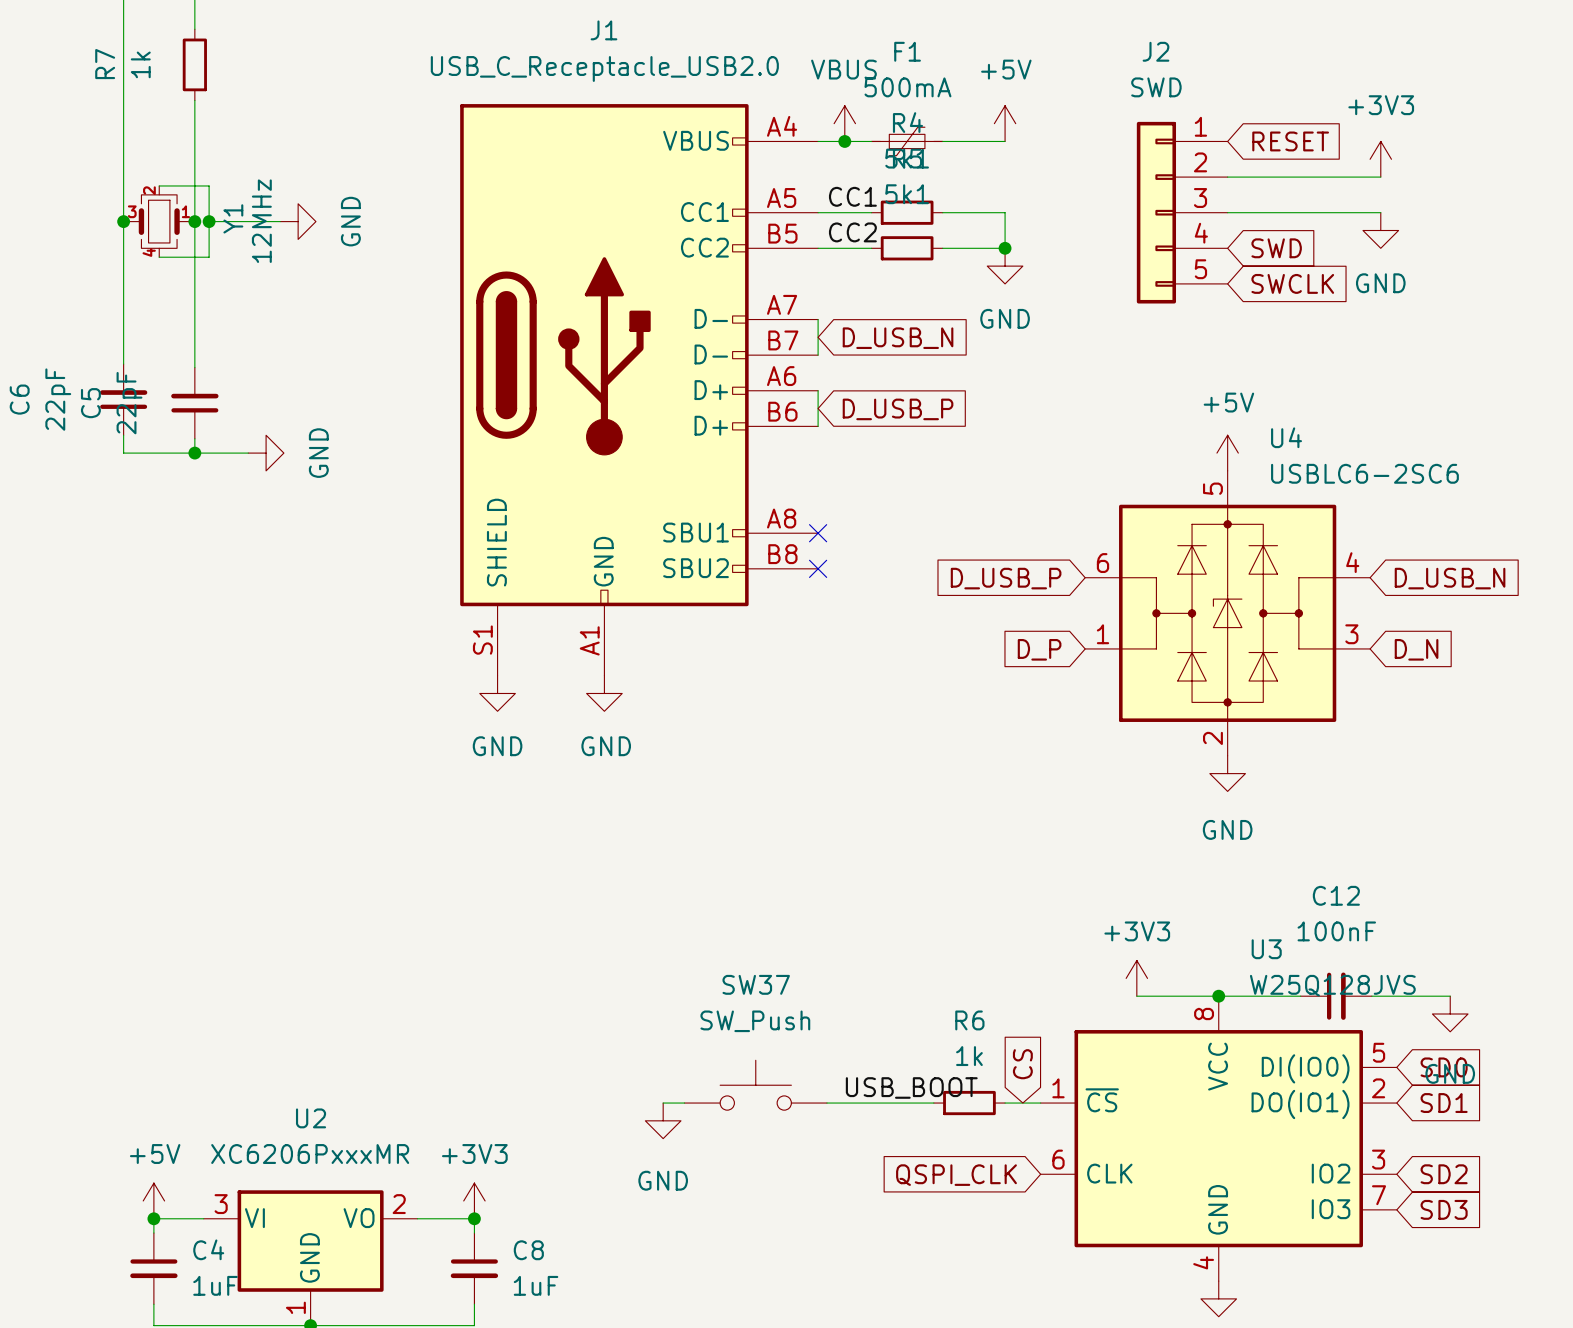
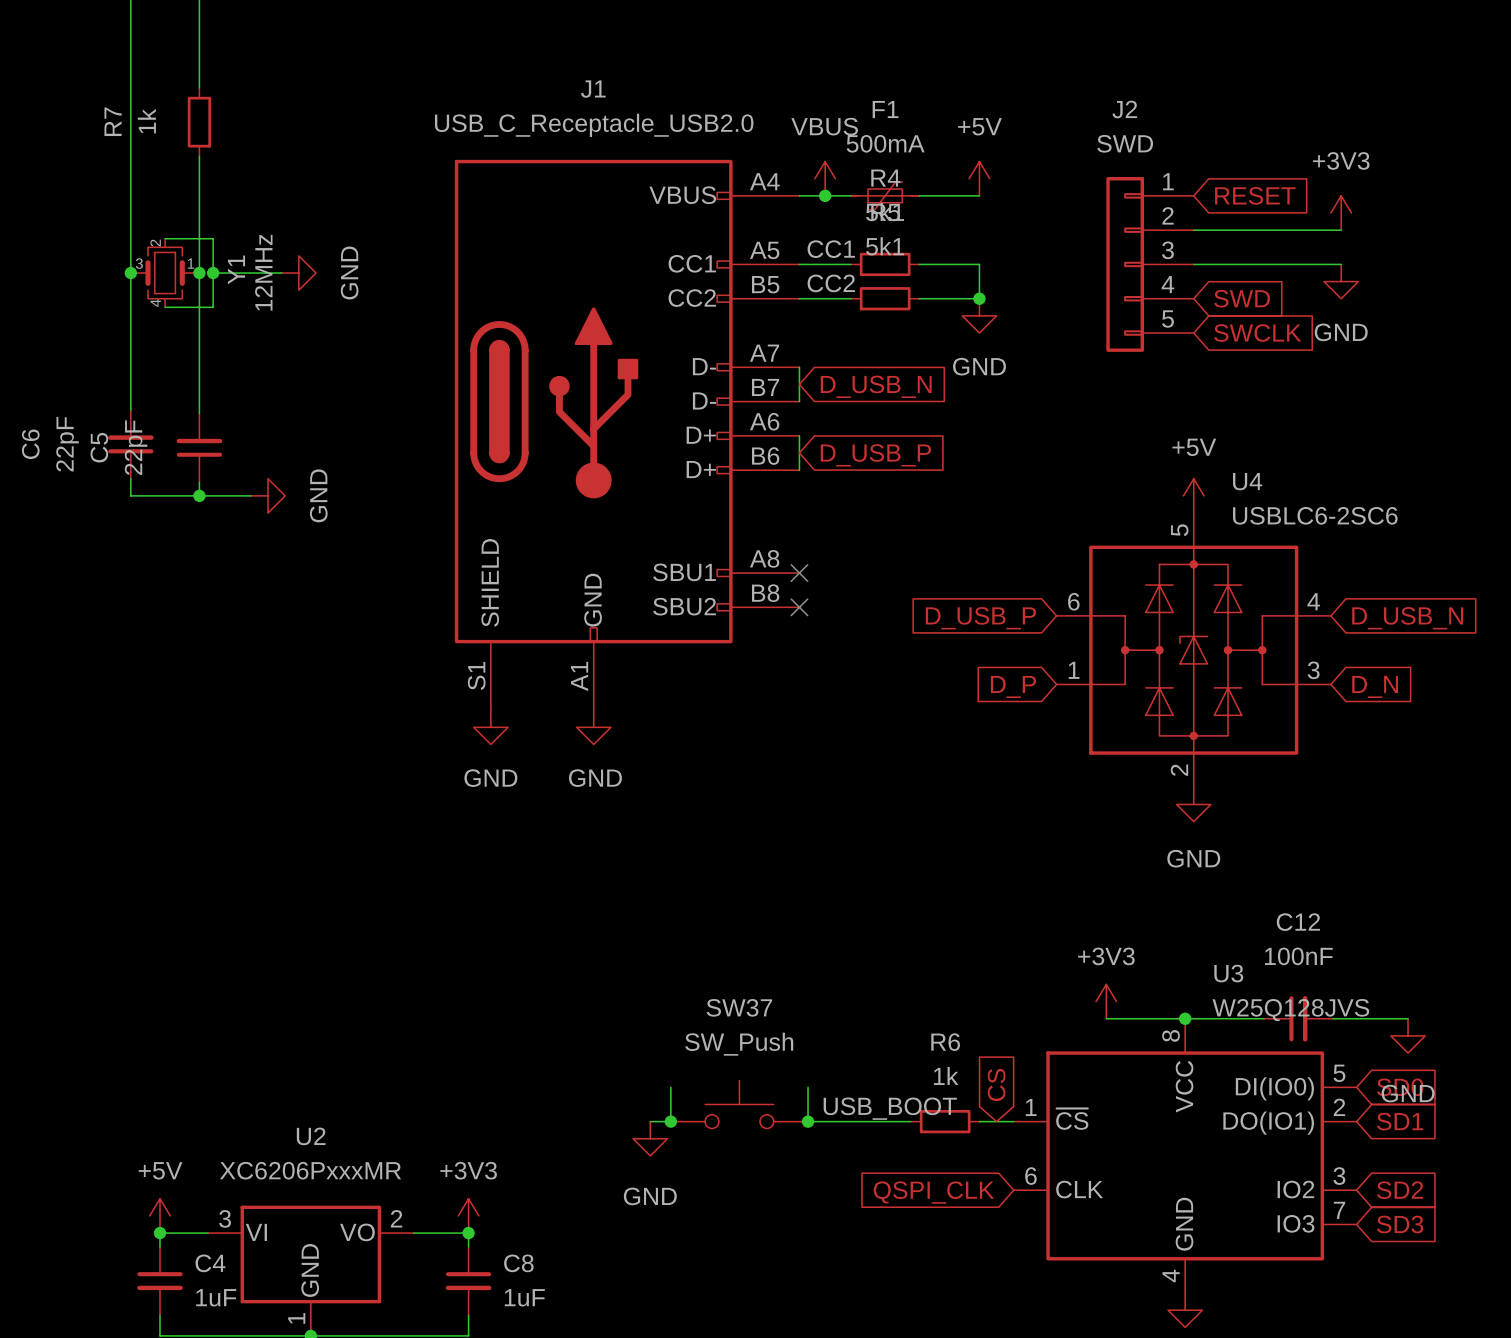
wire: none -> (670, 1087) (670, 1121)
wire: none -> (808, 1087) (808, 1121)
junction: none -> (670, 1121)
junction: none -> (808, 1121)

